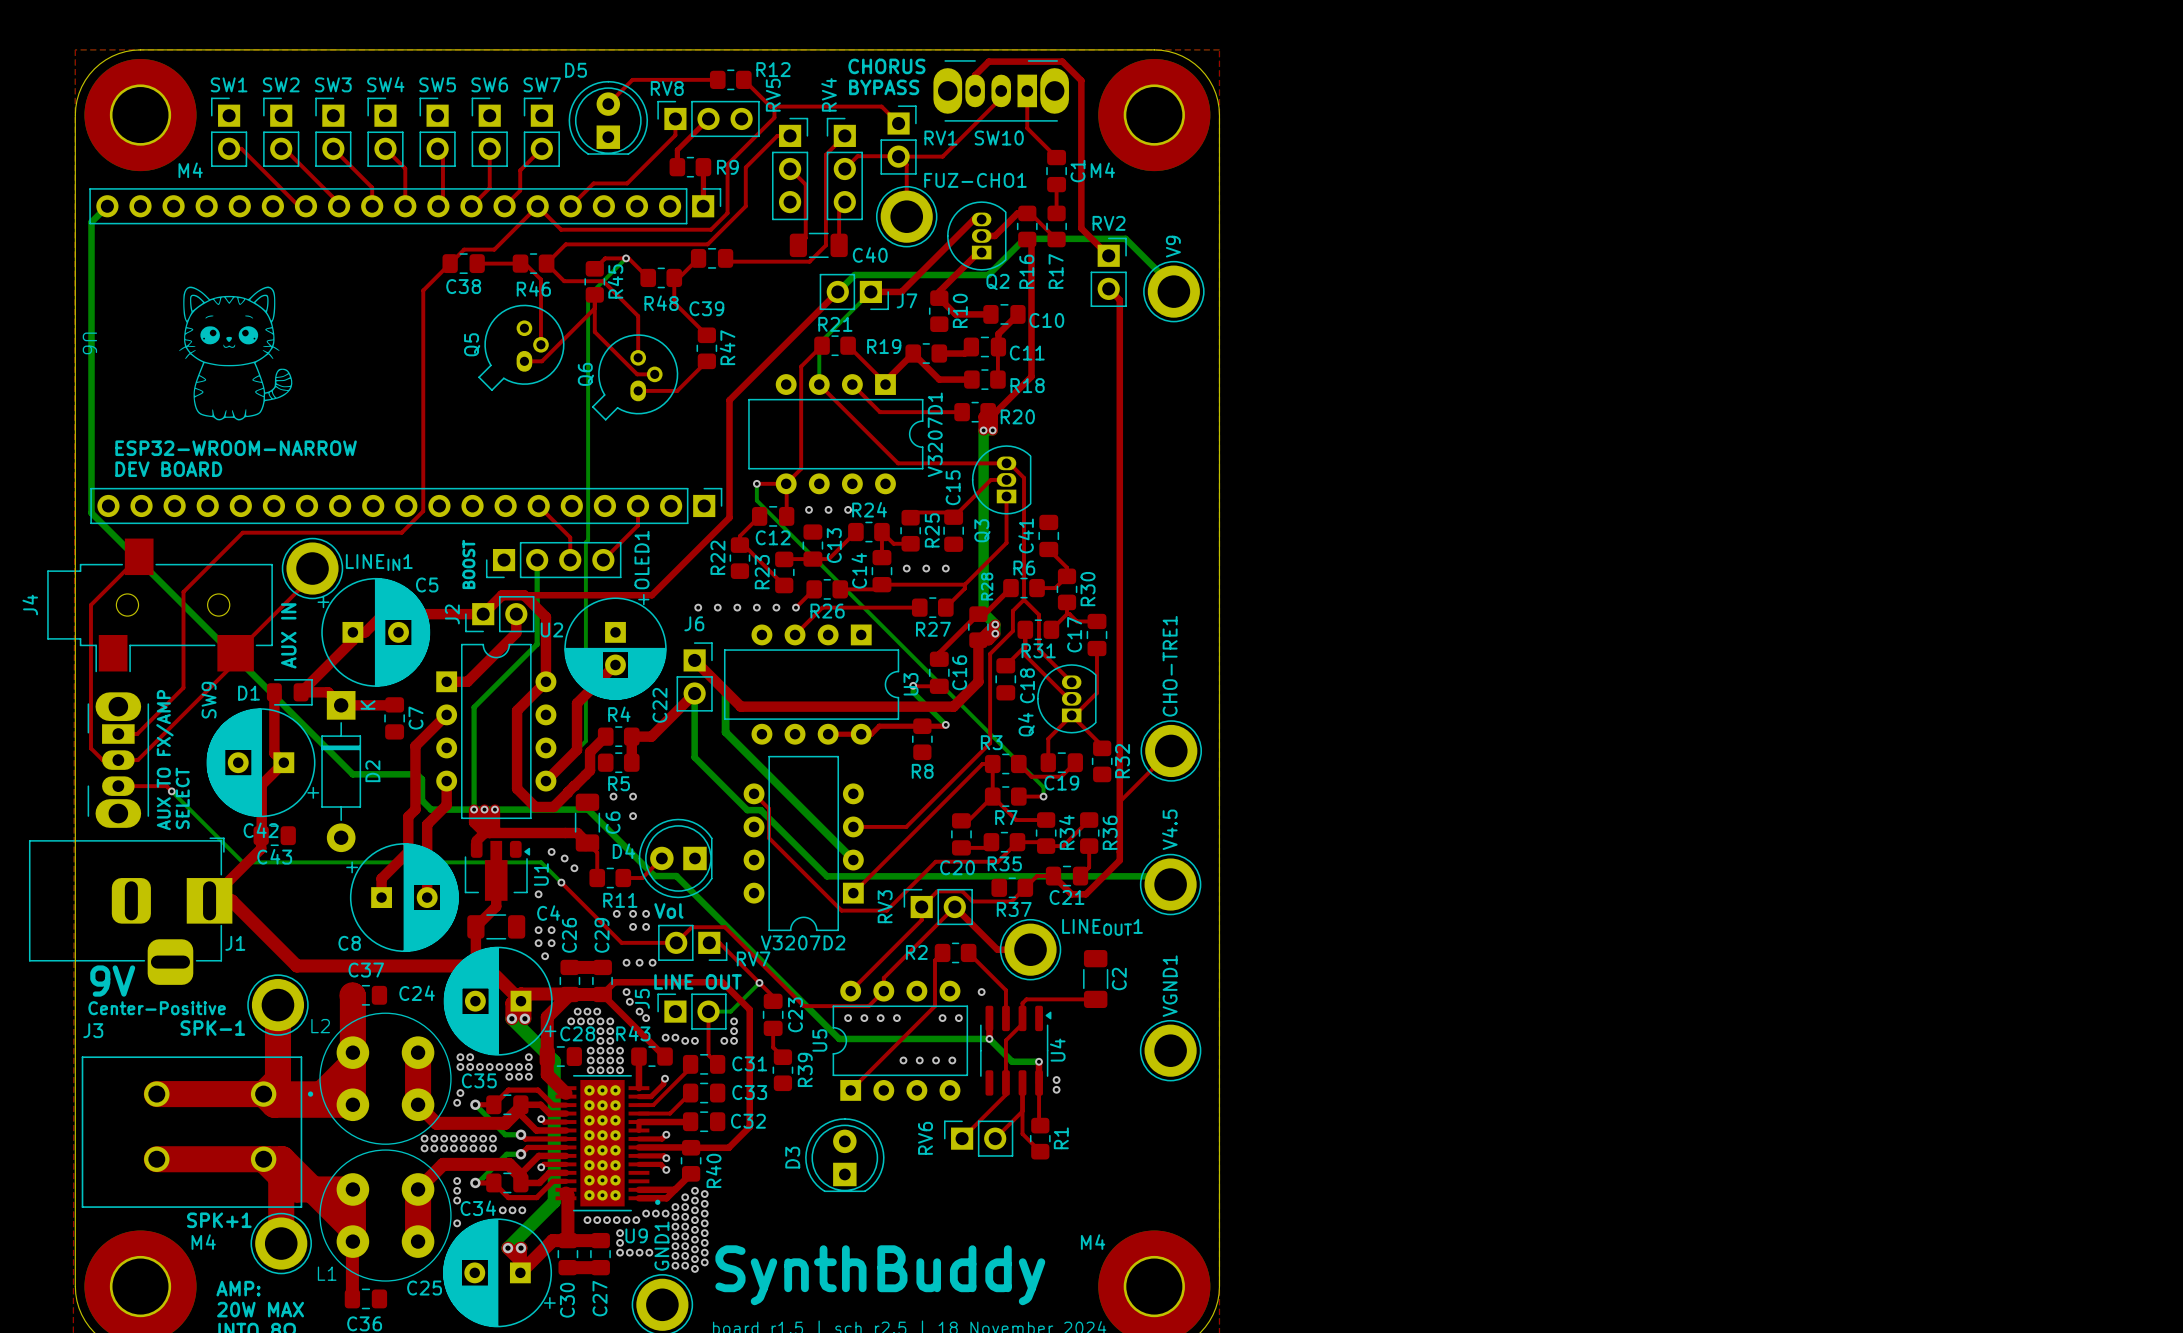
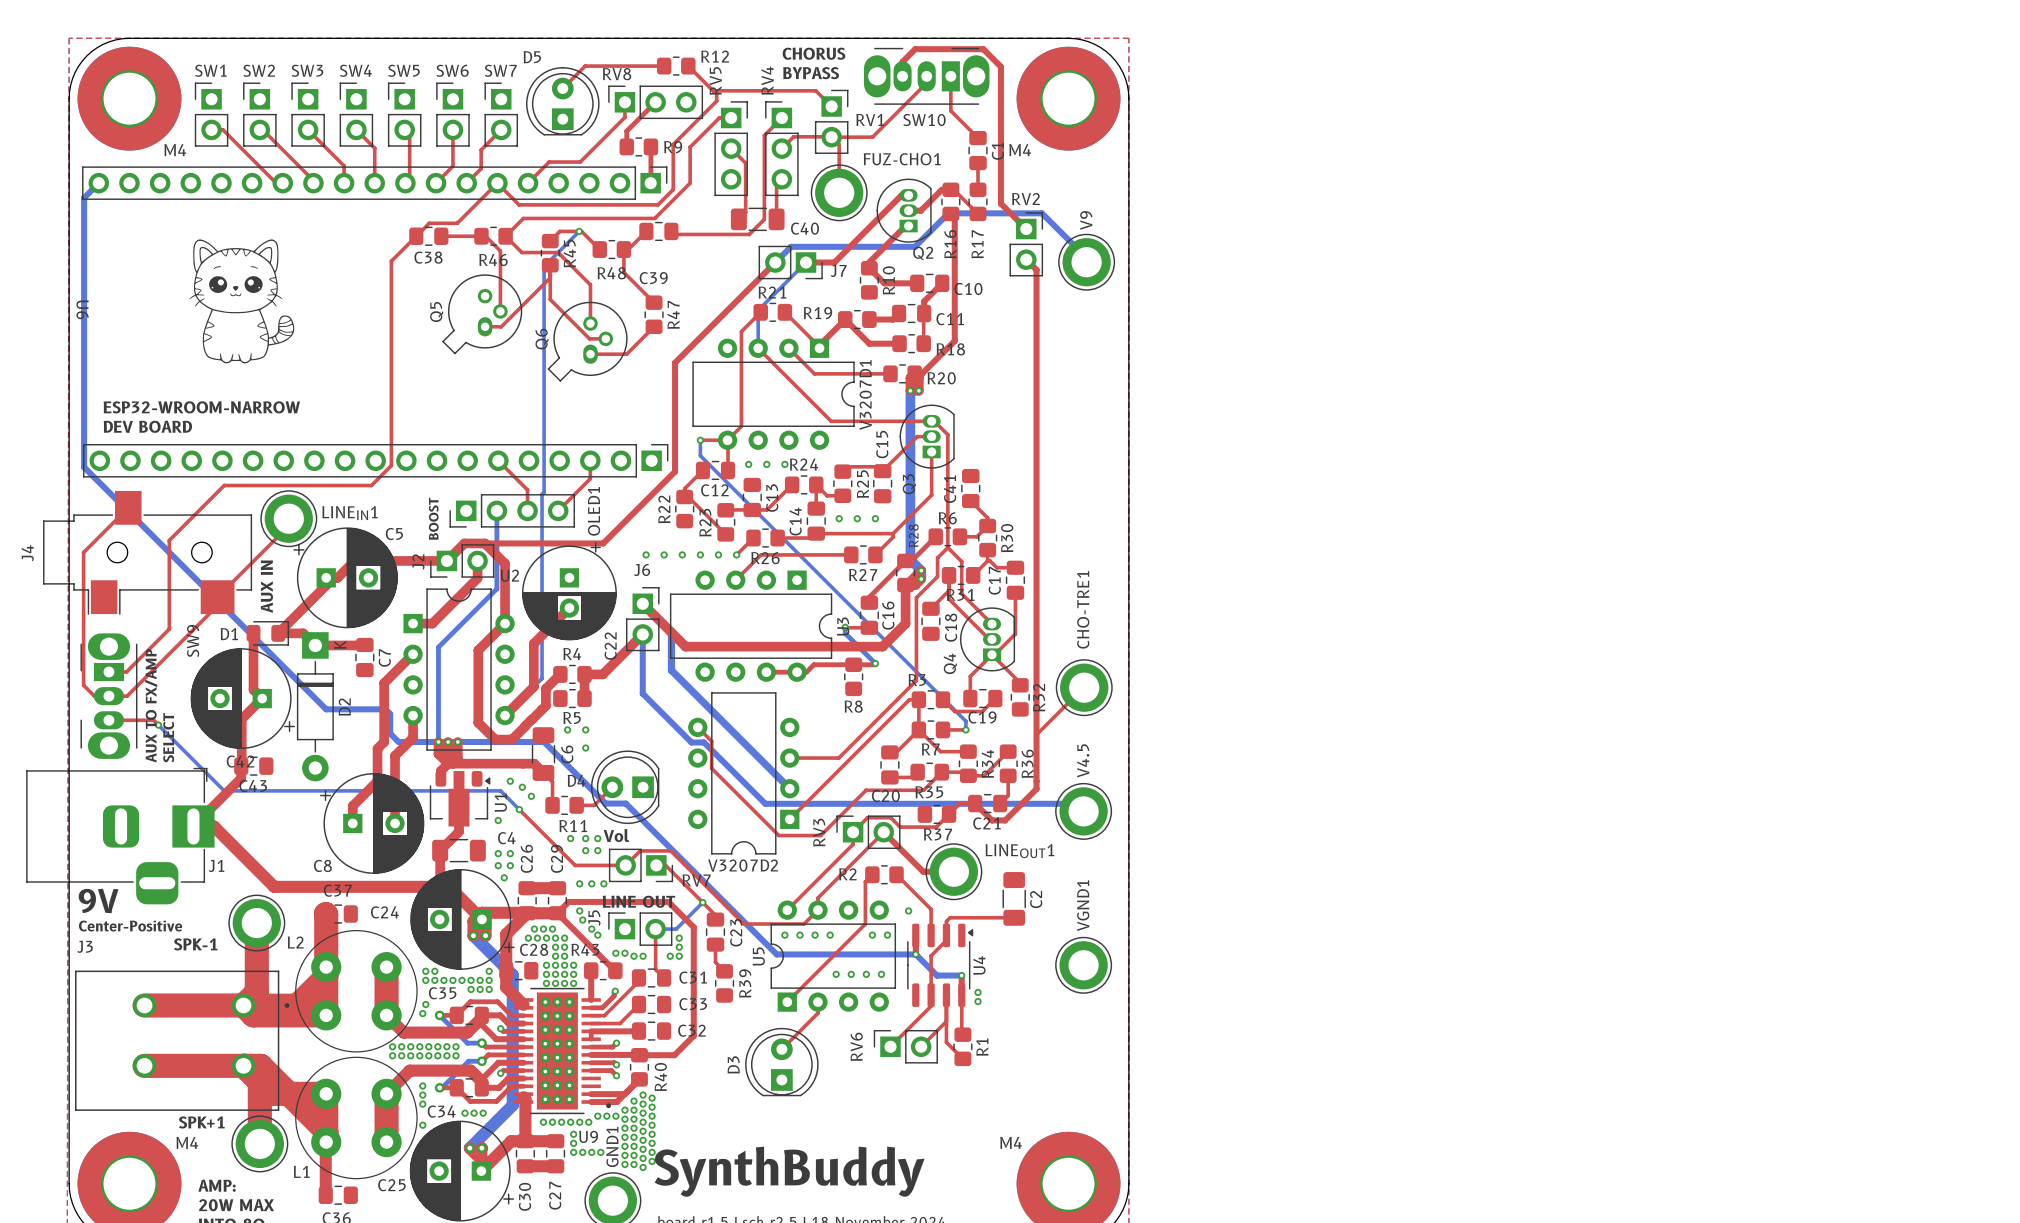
drawing position: (235, 353) -> (241, 301)
top track: none -> (817, 1002) (817, 1013) (781, 1049)

